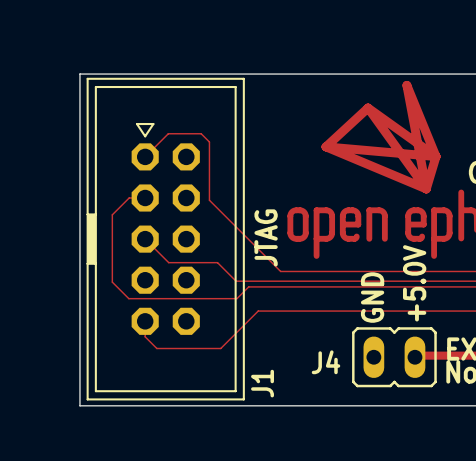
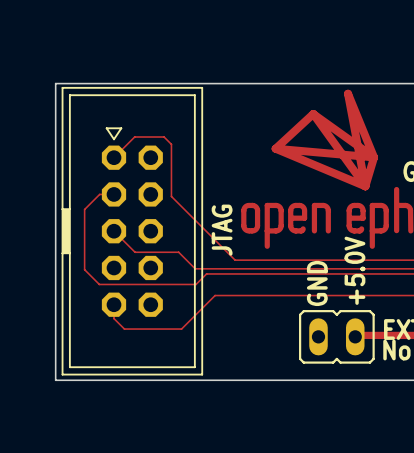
J4 name: J4 (326, 362) -> none
J1 name: J1 (262, 383) -> none

